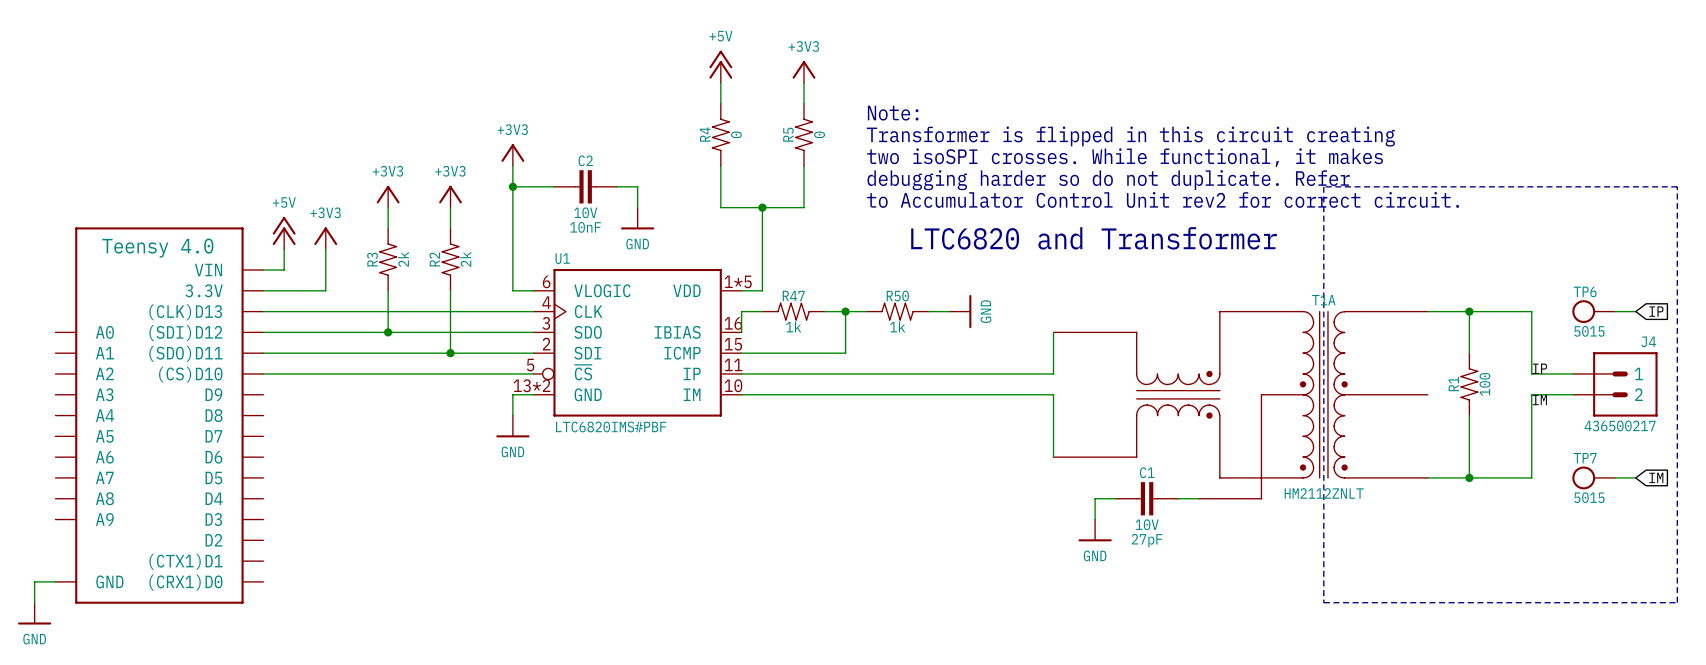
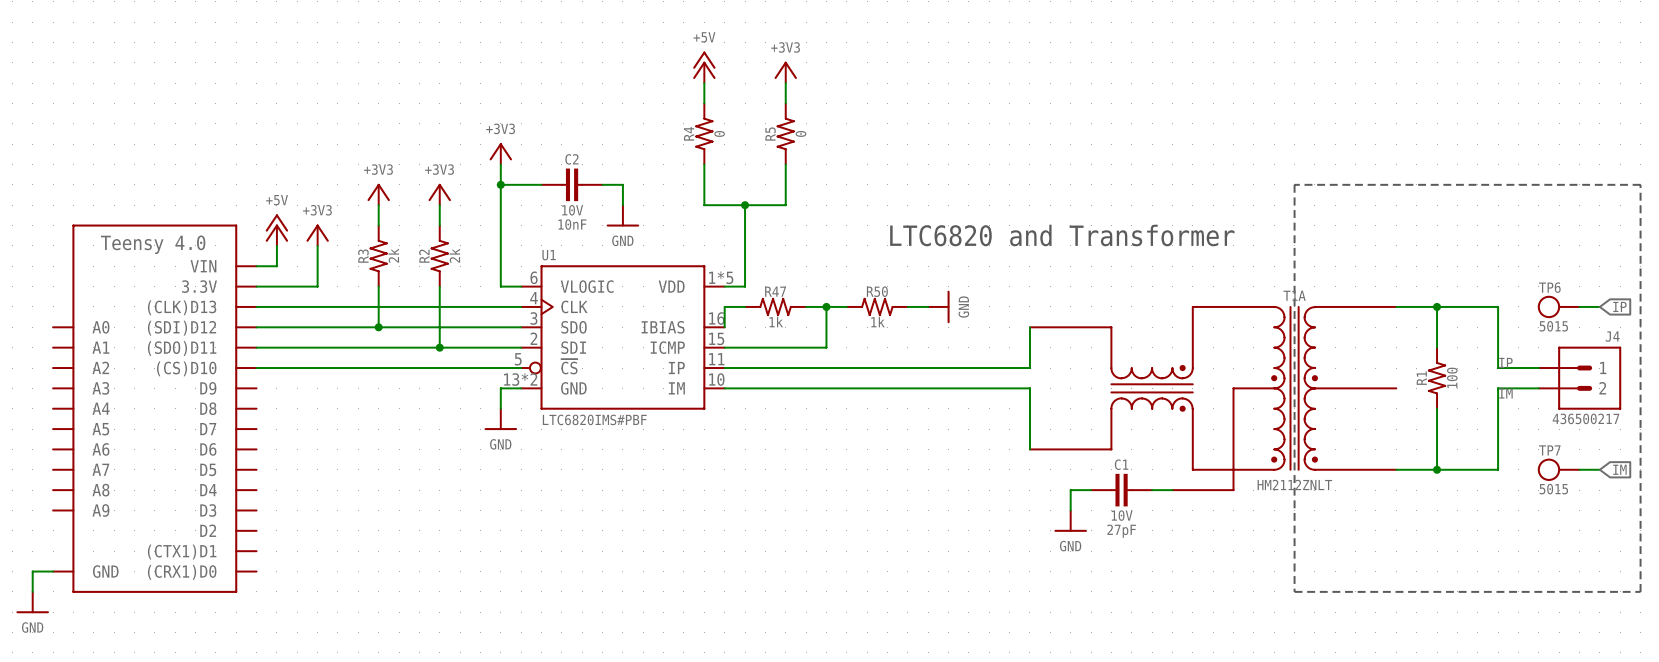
text: Note: (893, 113) -> none
text: Transformer is flipped in this circuit creating (1130, 136) -> none
text: two isoSPI crosses. While functional, it makes (1125, 157) -> none
text: debugging harder so do not duplicate. Refer (1108, 180) -> none
text: to Accumulator Control Unit rev2 for correct circuit. (1163, 199) -> none

